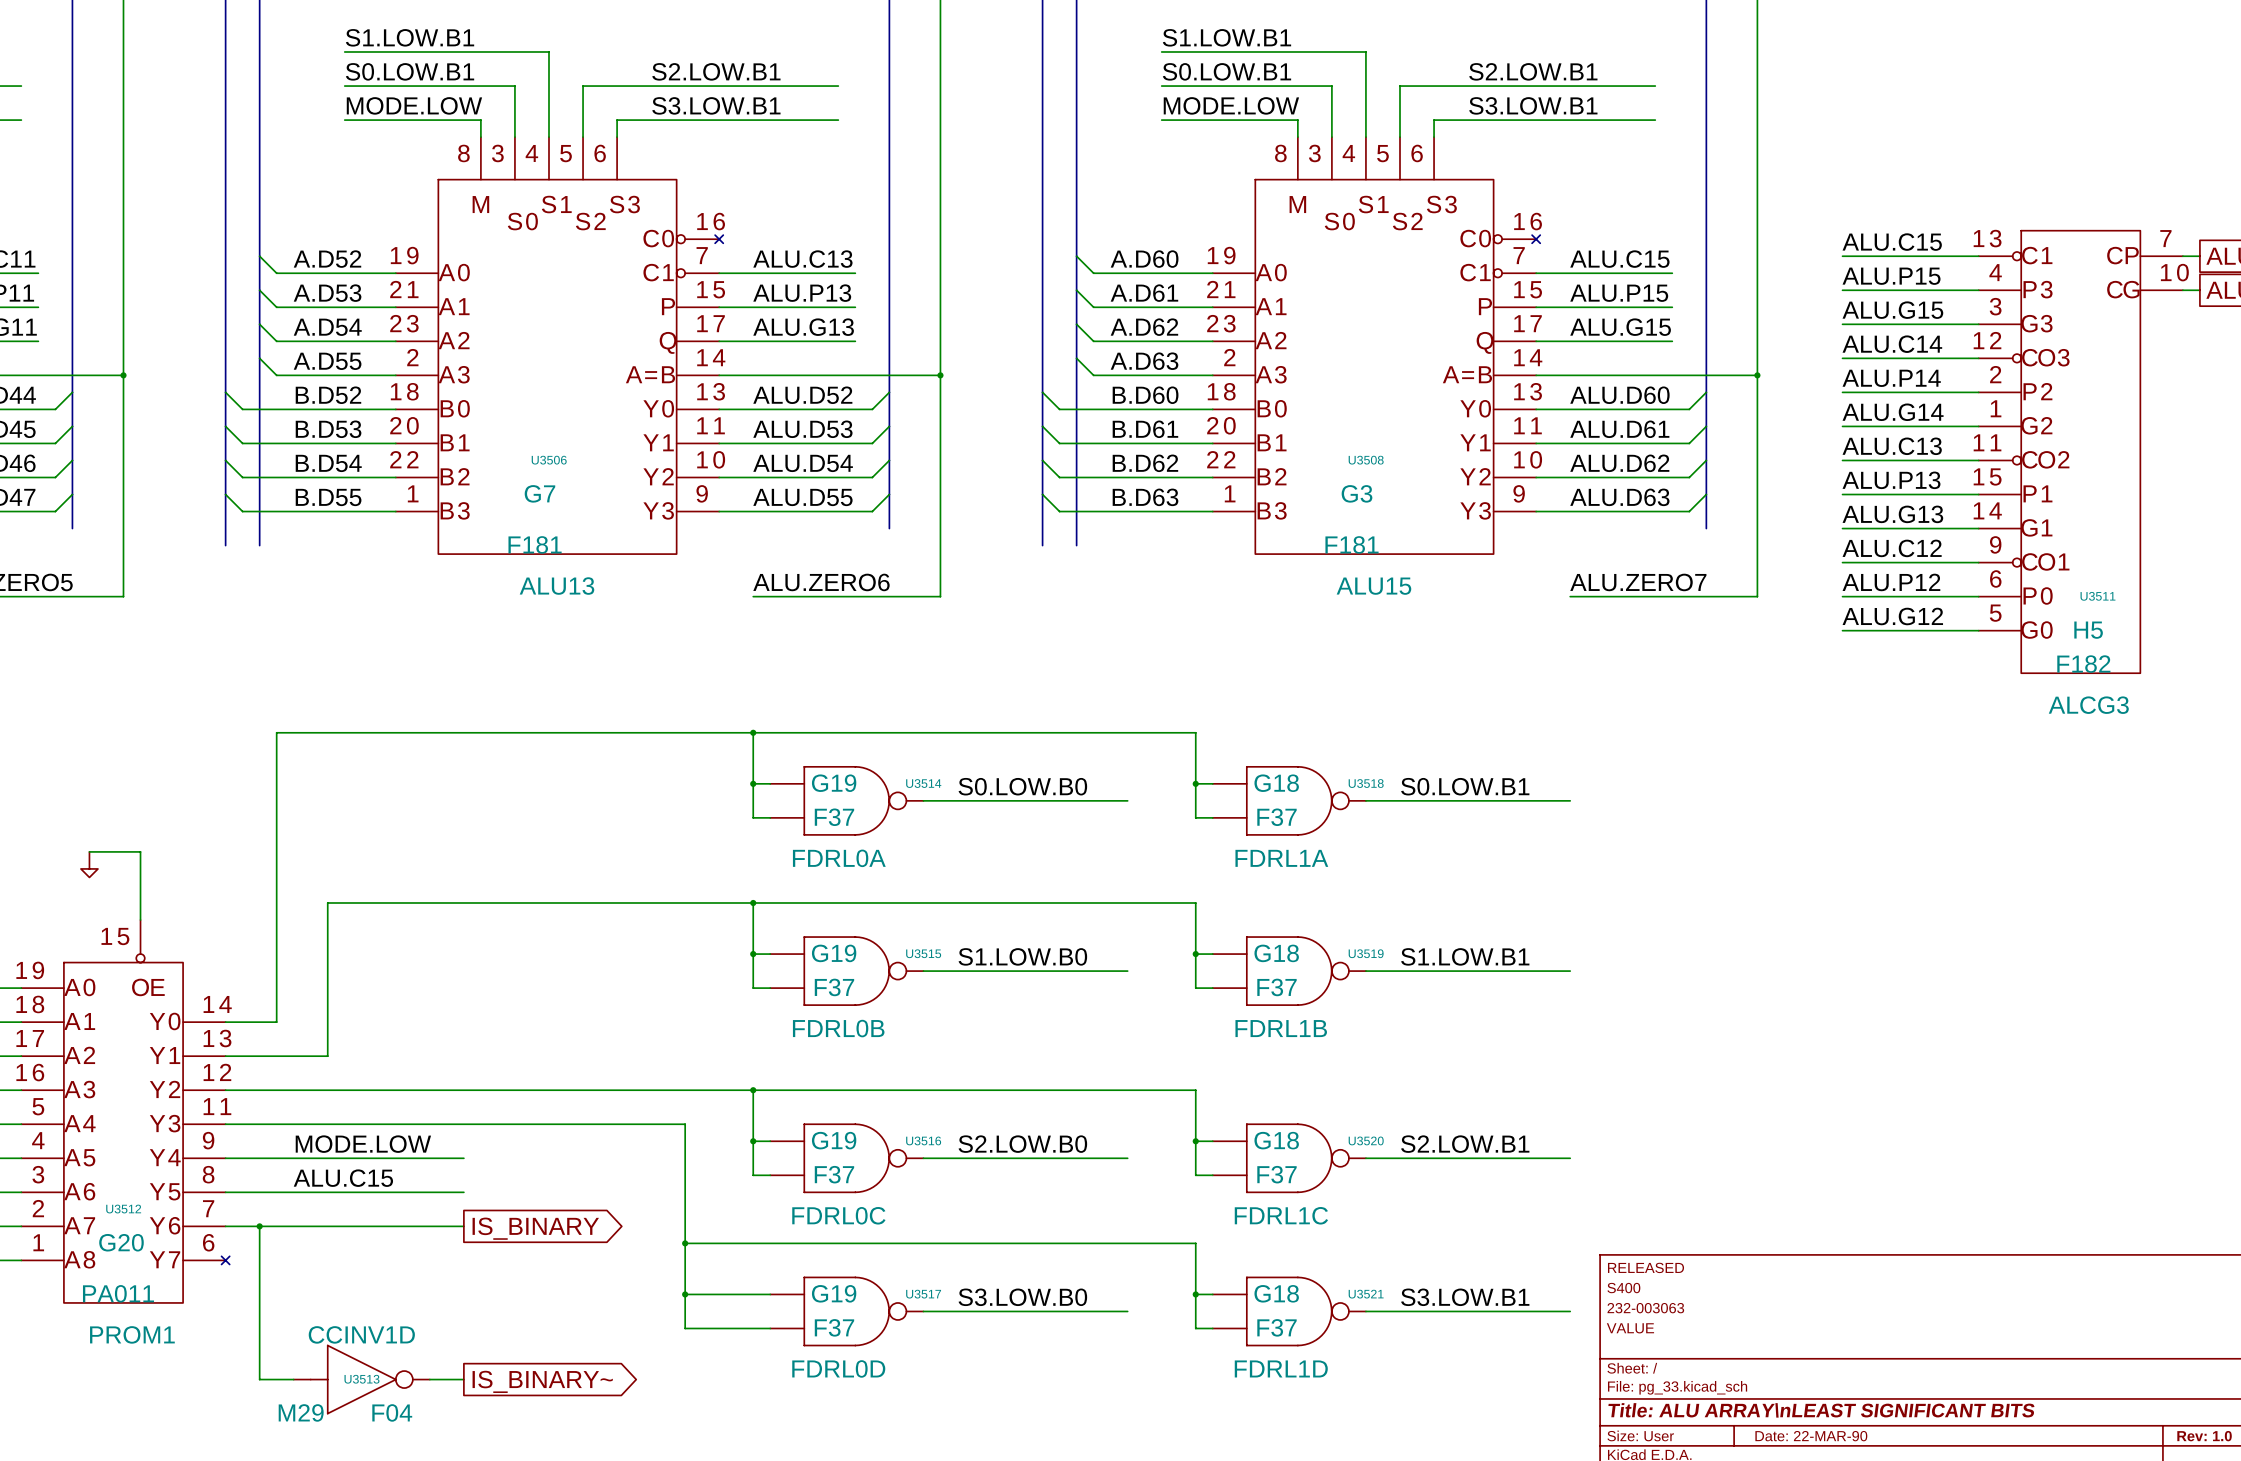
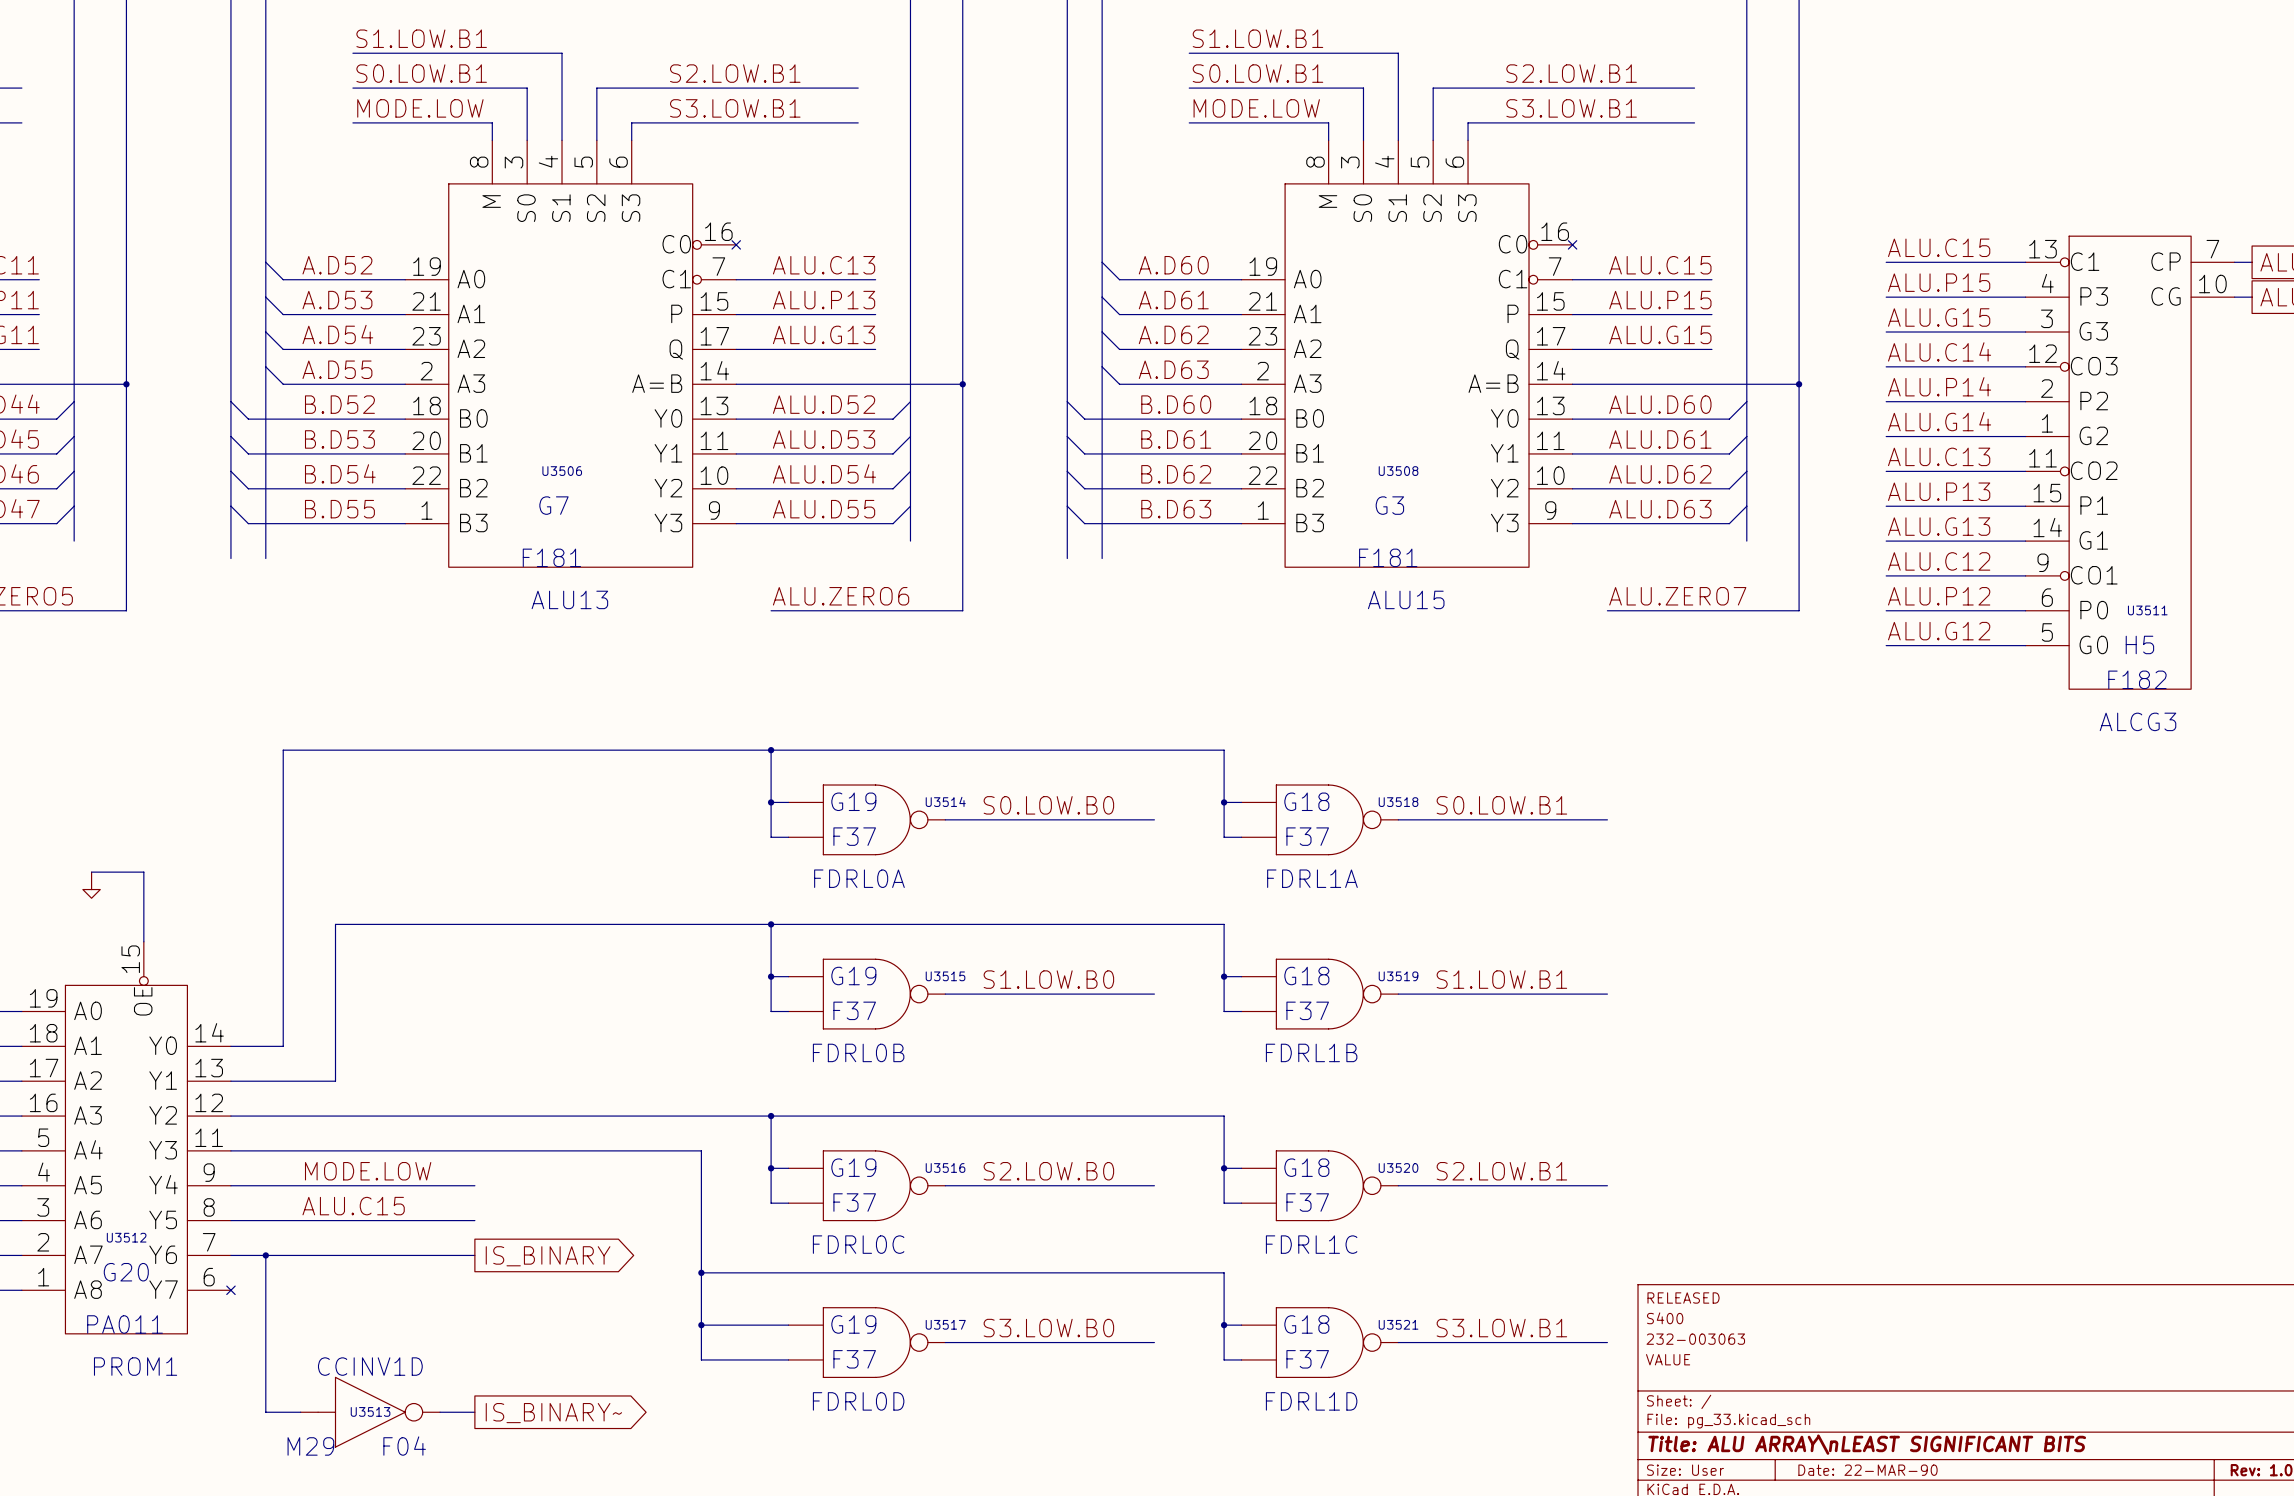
U3506 symbol: [395, 137, 720, 555] -> [405, 140, 737, 568]
U3508 symbol: [1212, 137, 1537, 555] -> [1241, 140, 1573, 568]
U3511 symbol: [1978, 230, 2183, 674] -> [2025, 236, 2235, 690]
U3512 symbol: [21, 920, 226, 1303] -> [21, 941, 231, 1334]

